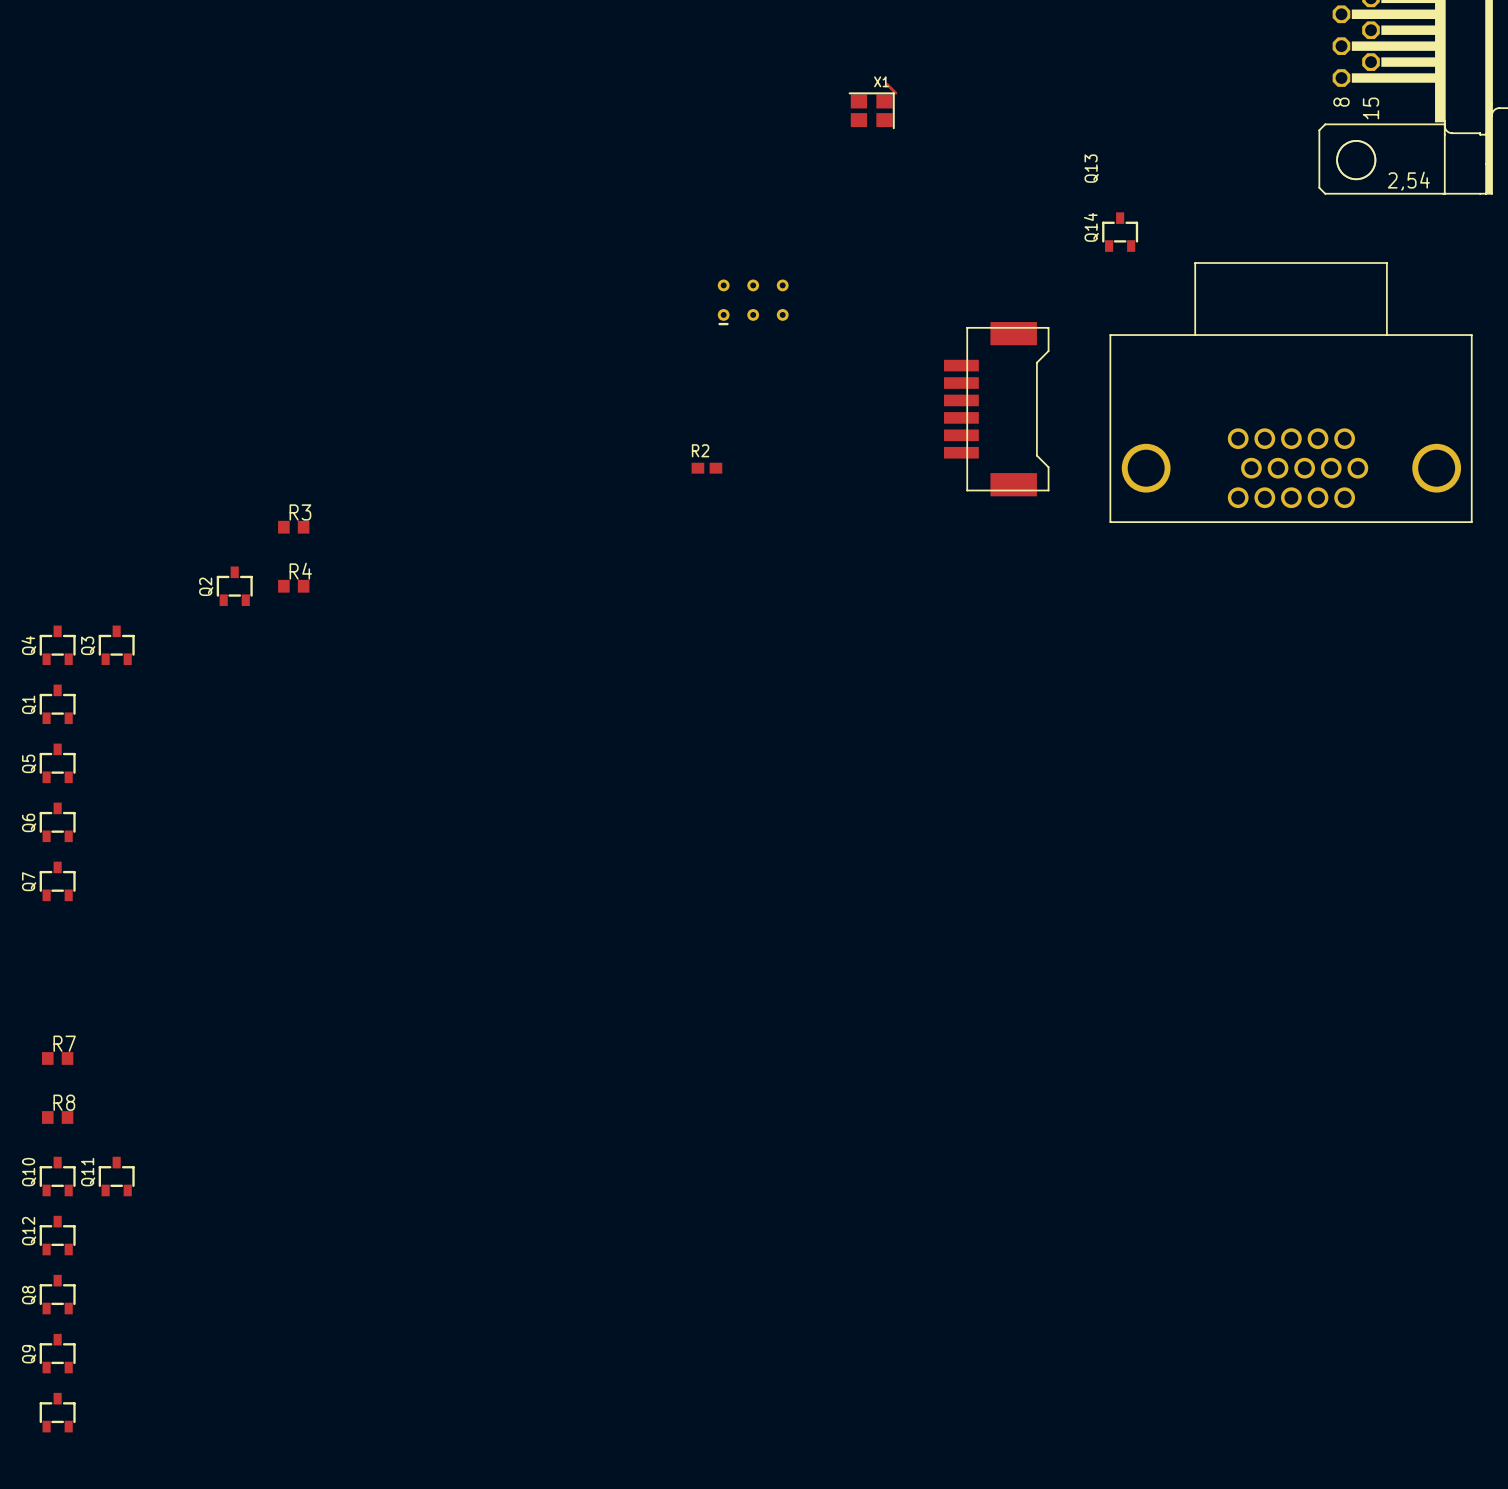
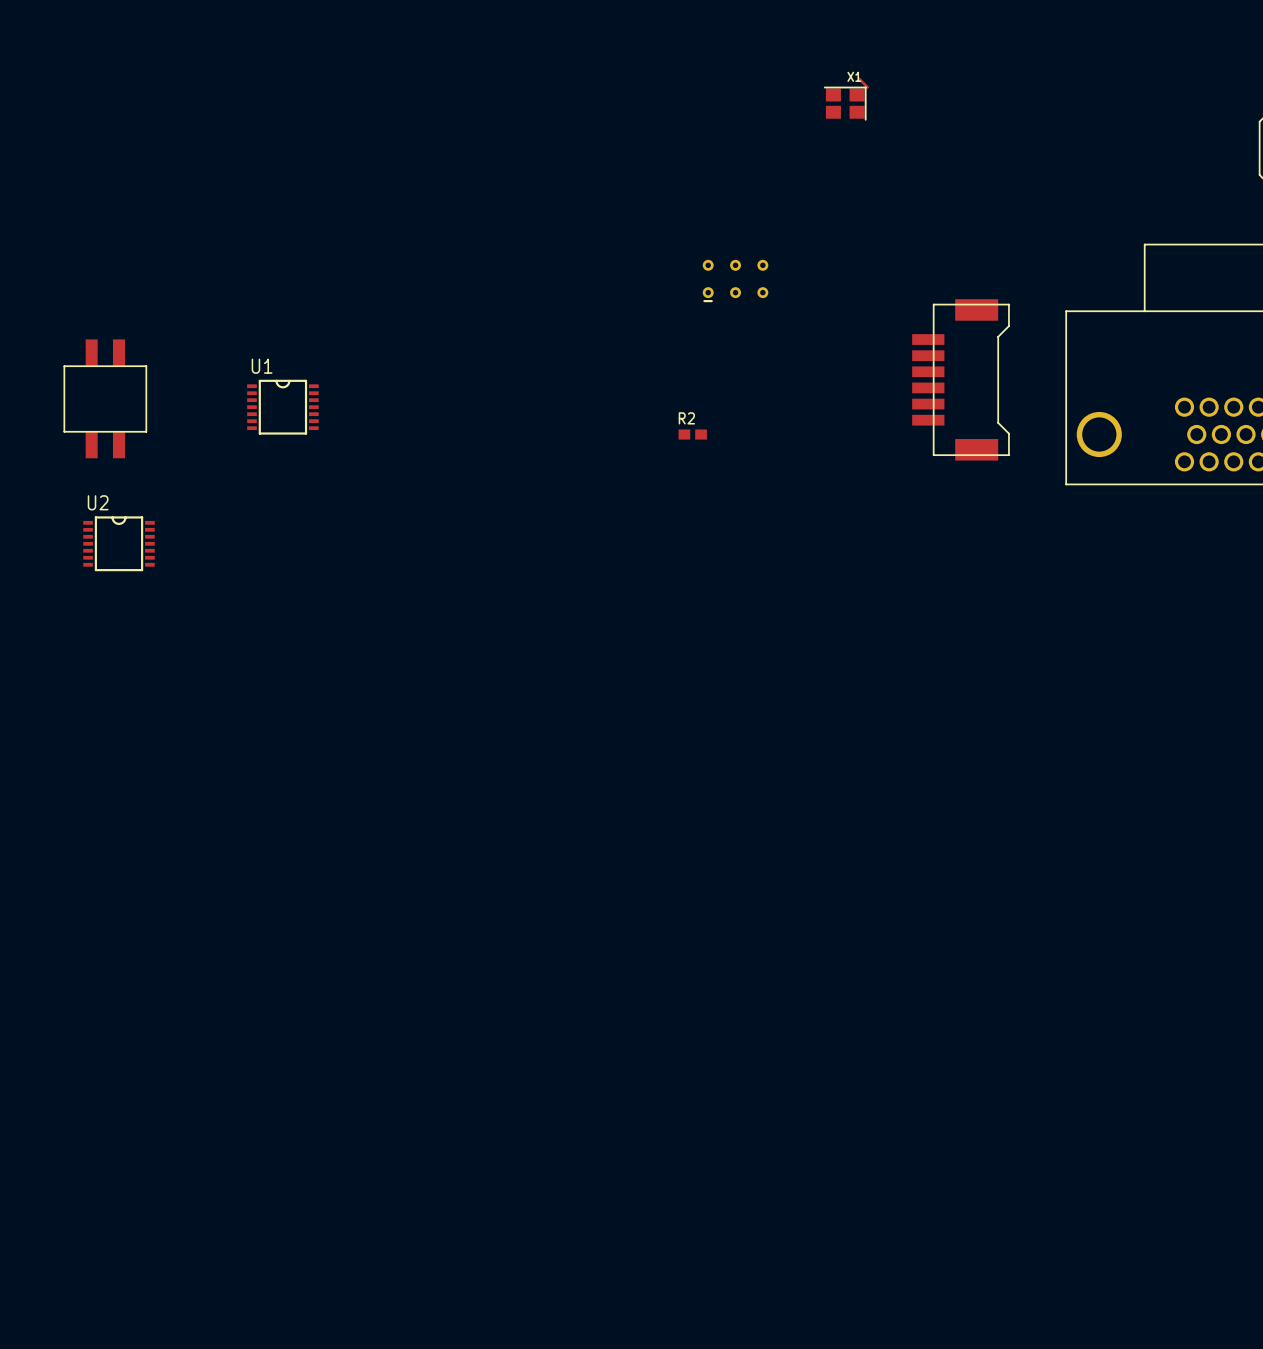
Q14: (1120, 232) -> none
part: none -> (105, 398)
U1: none -> (282, 407)
R3: (293, 527) -> none
U2: none -> (119, 543)
Q2: (234, 586) -> none
R4: (293, 586) -> none
Q4: (57, 645) -> none
Q3: (116, 645) -> none
Q1: (57, 704) -> none
Q5: (57, 763) -> none
Q6: (57, 822) -> none
Q7: (57, 881) -> none
R7: (57, 1058) -> none
R8: (57, 1117) -> none
Q10: (57, 1176) -> none
Q11: (116, 1176) -> none
Q12: (57, 1235) -> none
Q8: (57, 1294) -> none
Q9: (57, 1353) -> none
Q13: (57, 1412) -> none

